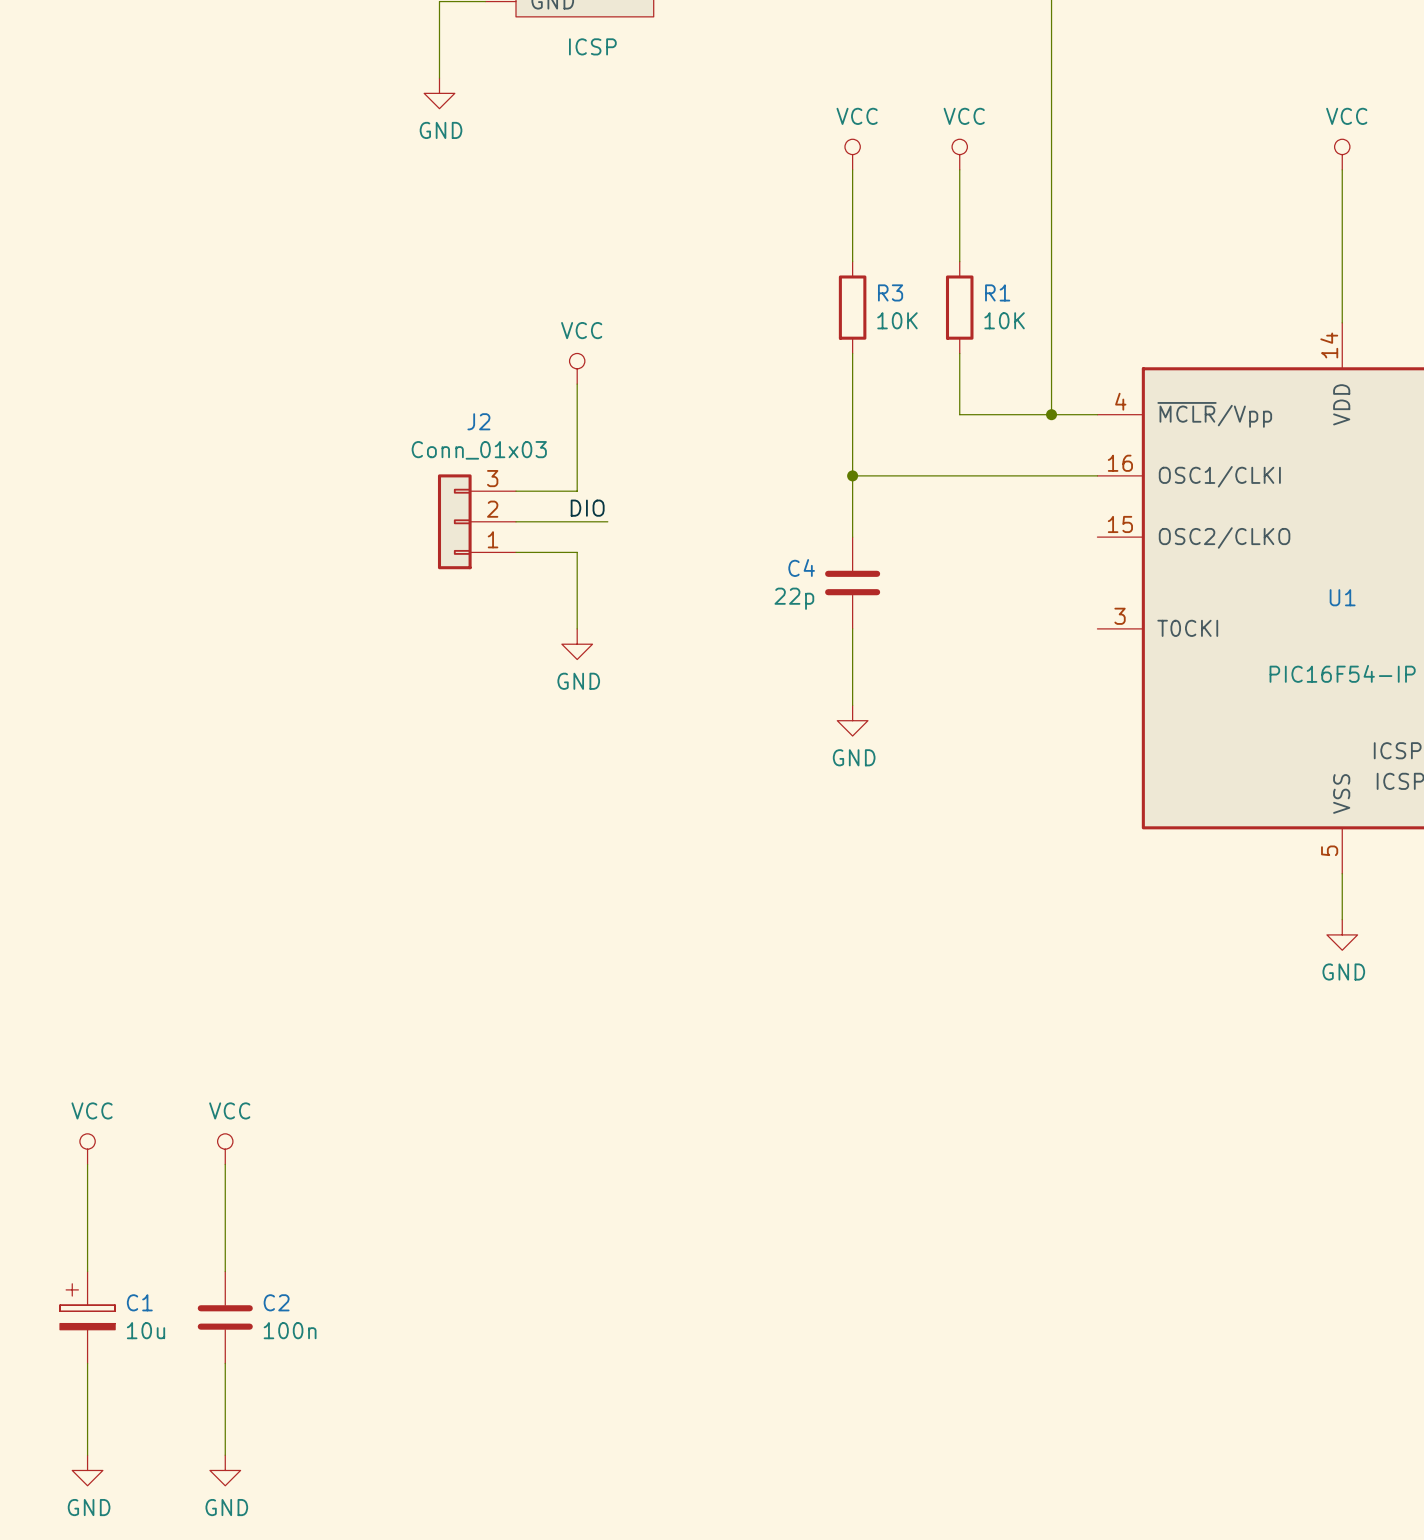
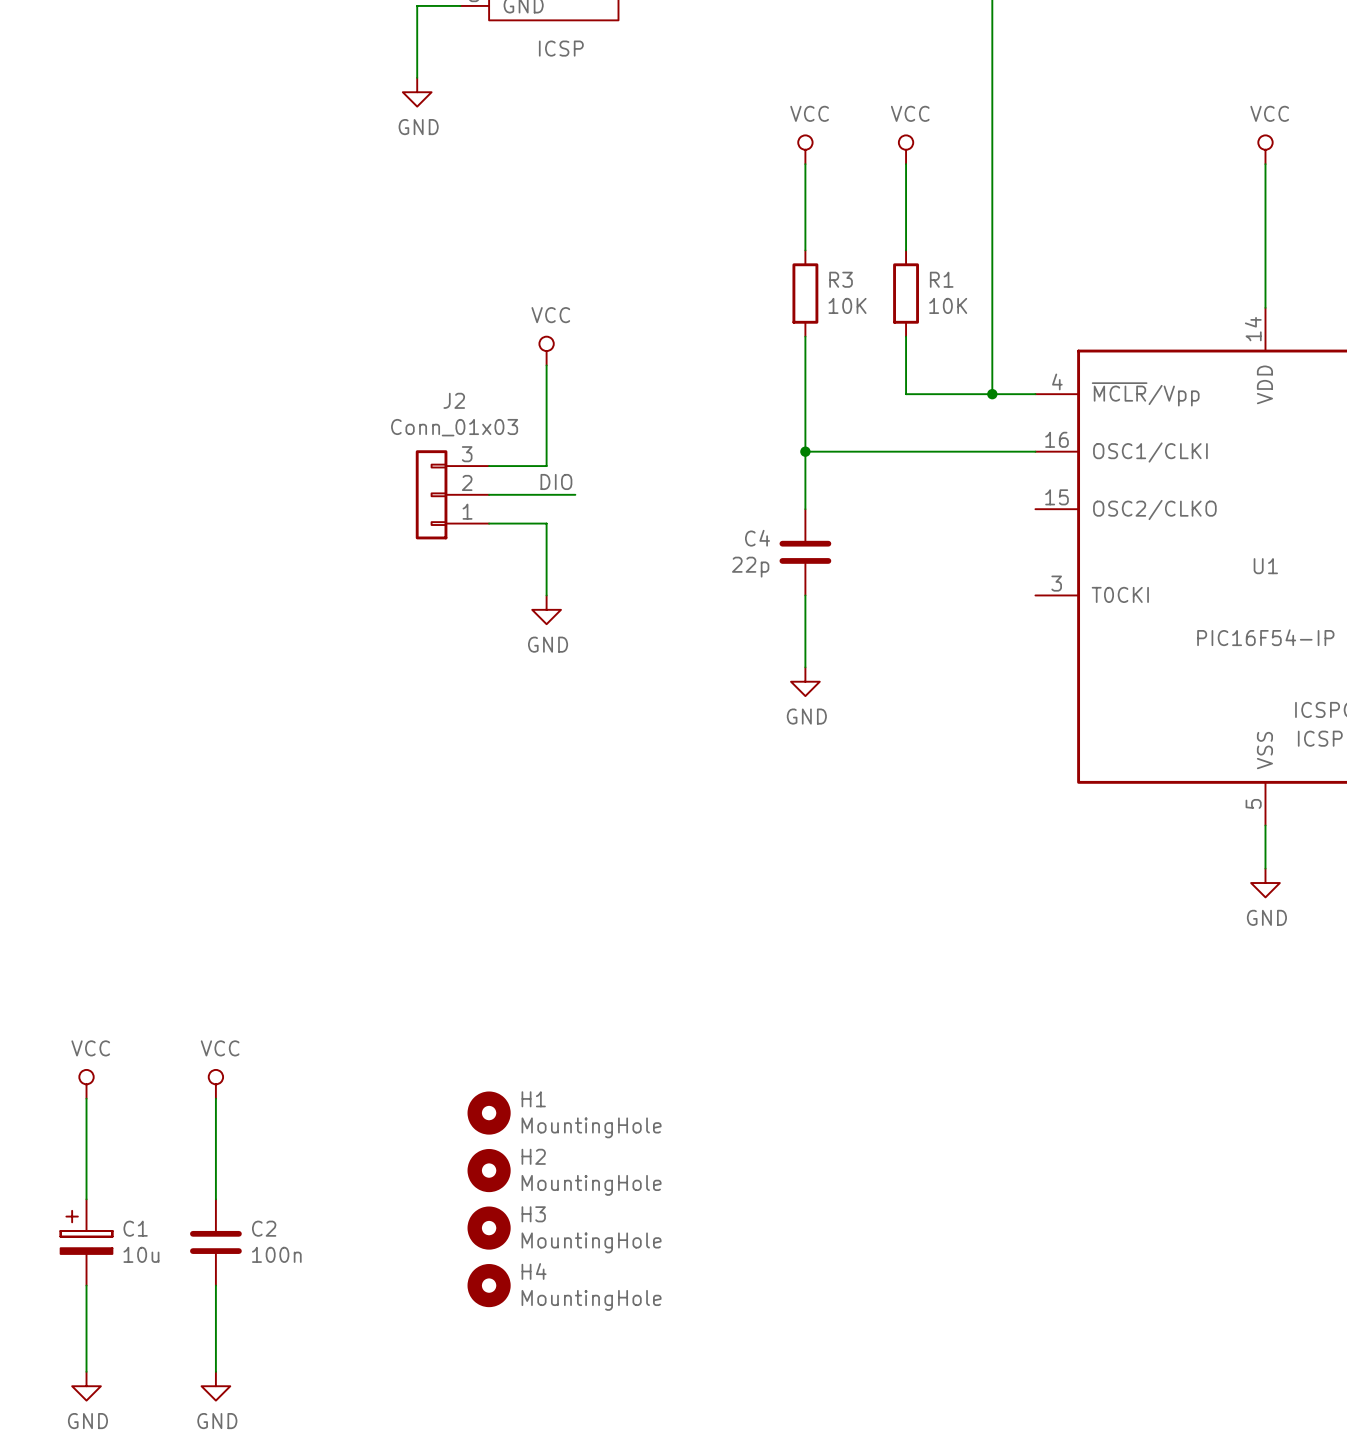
H1: none -> MountingHole (489, 1113)
H2: none -> MountingHole (489, 1170)
H3: none -> MountingHole (489, 1228)
H4: none -> MountingHole (489, 1285)

